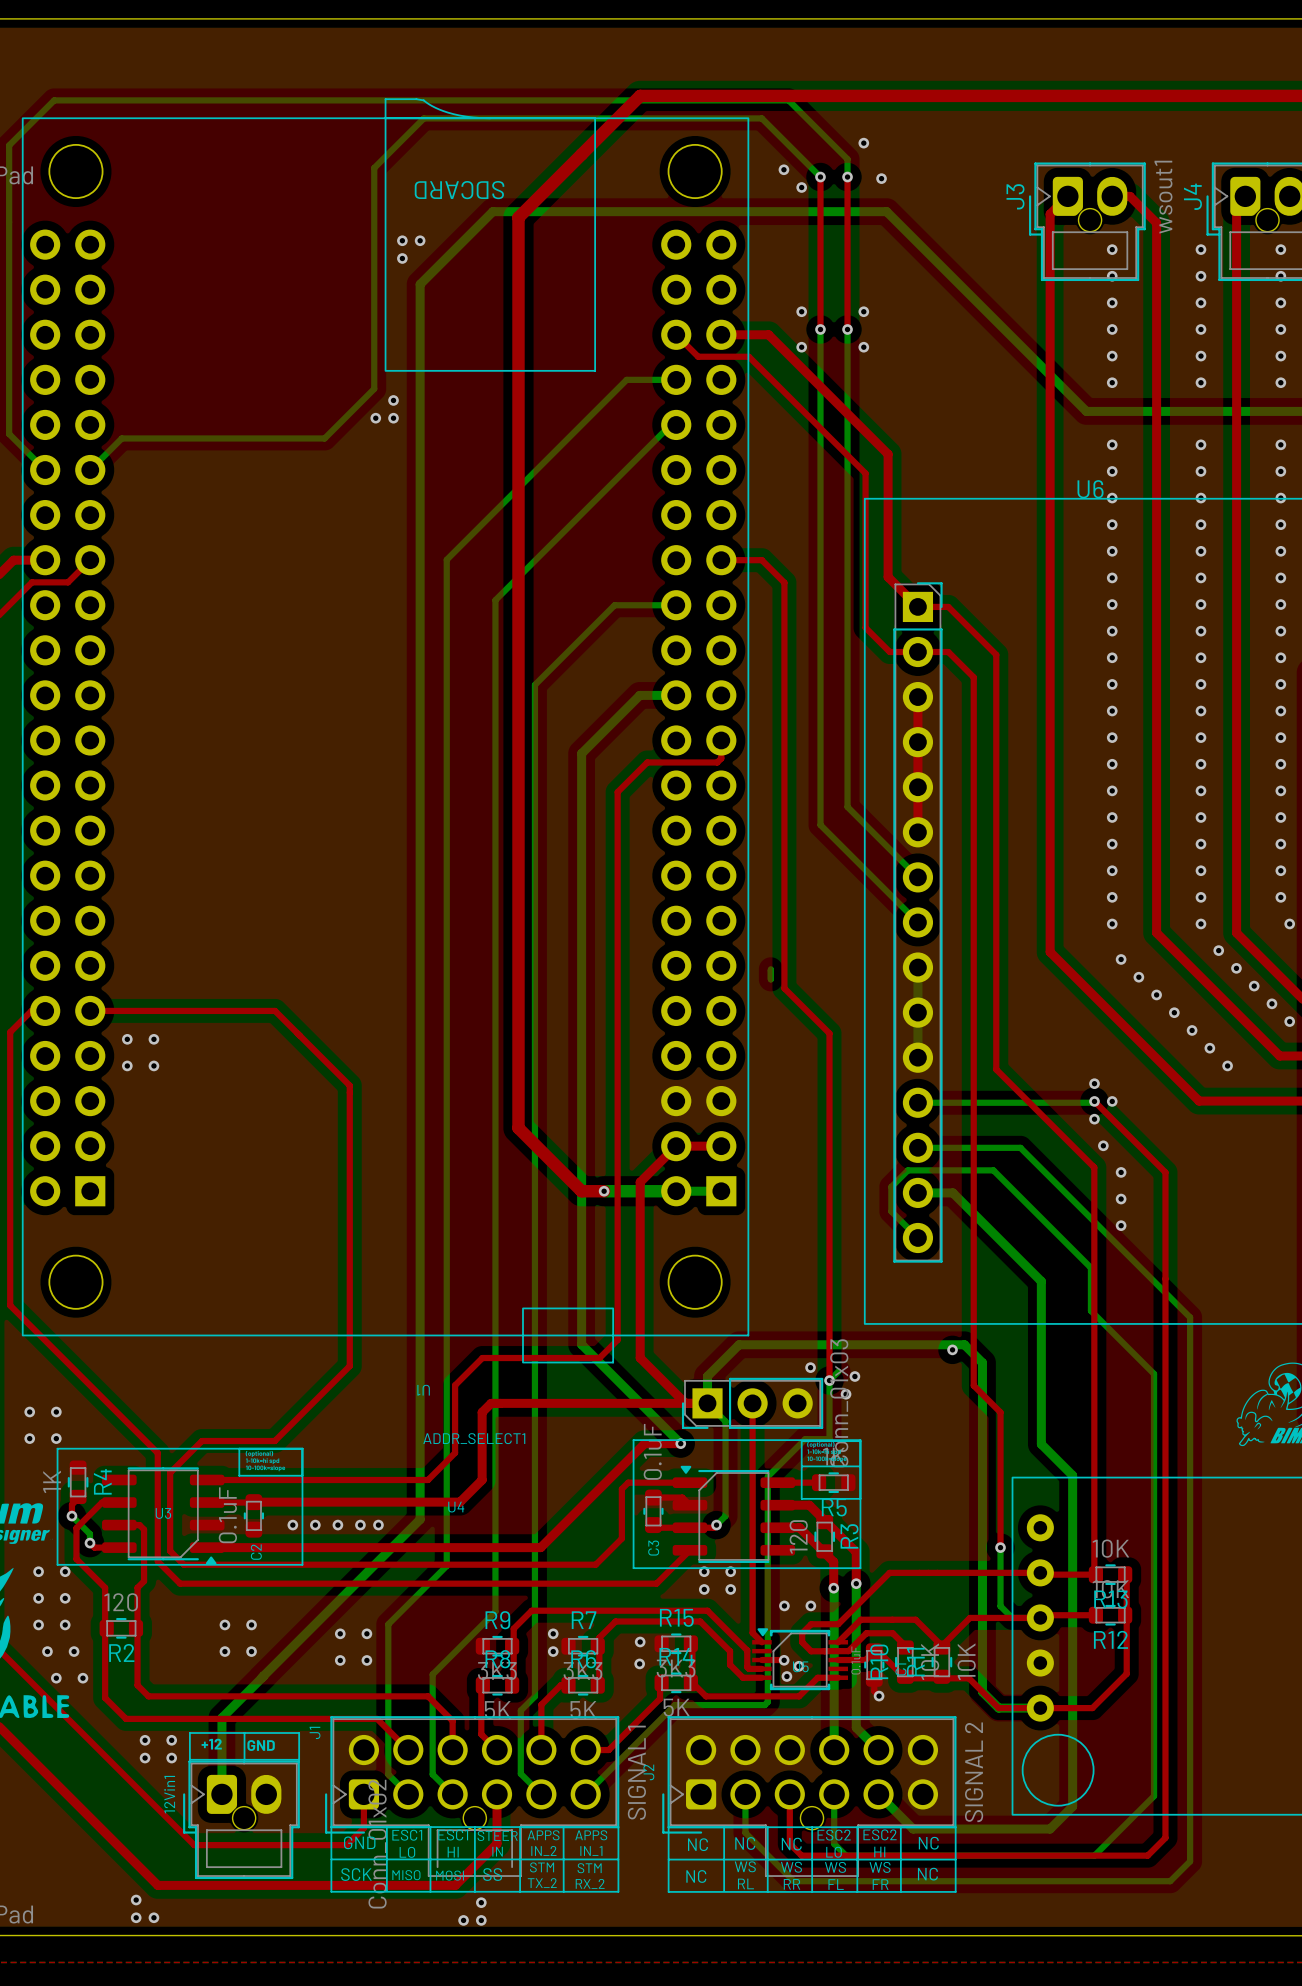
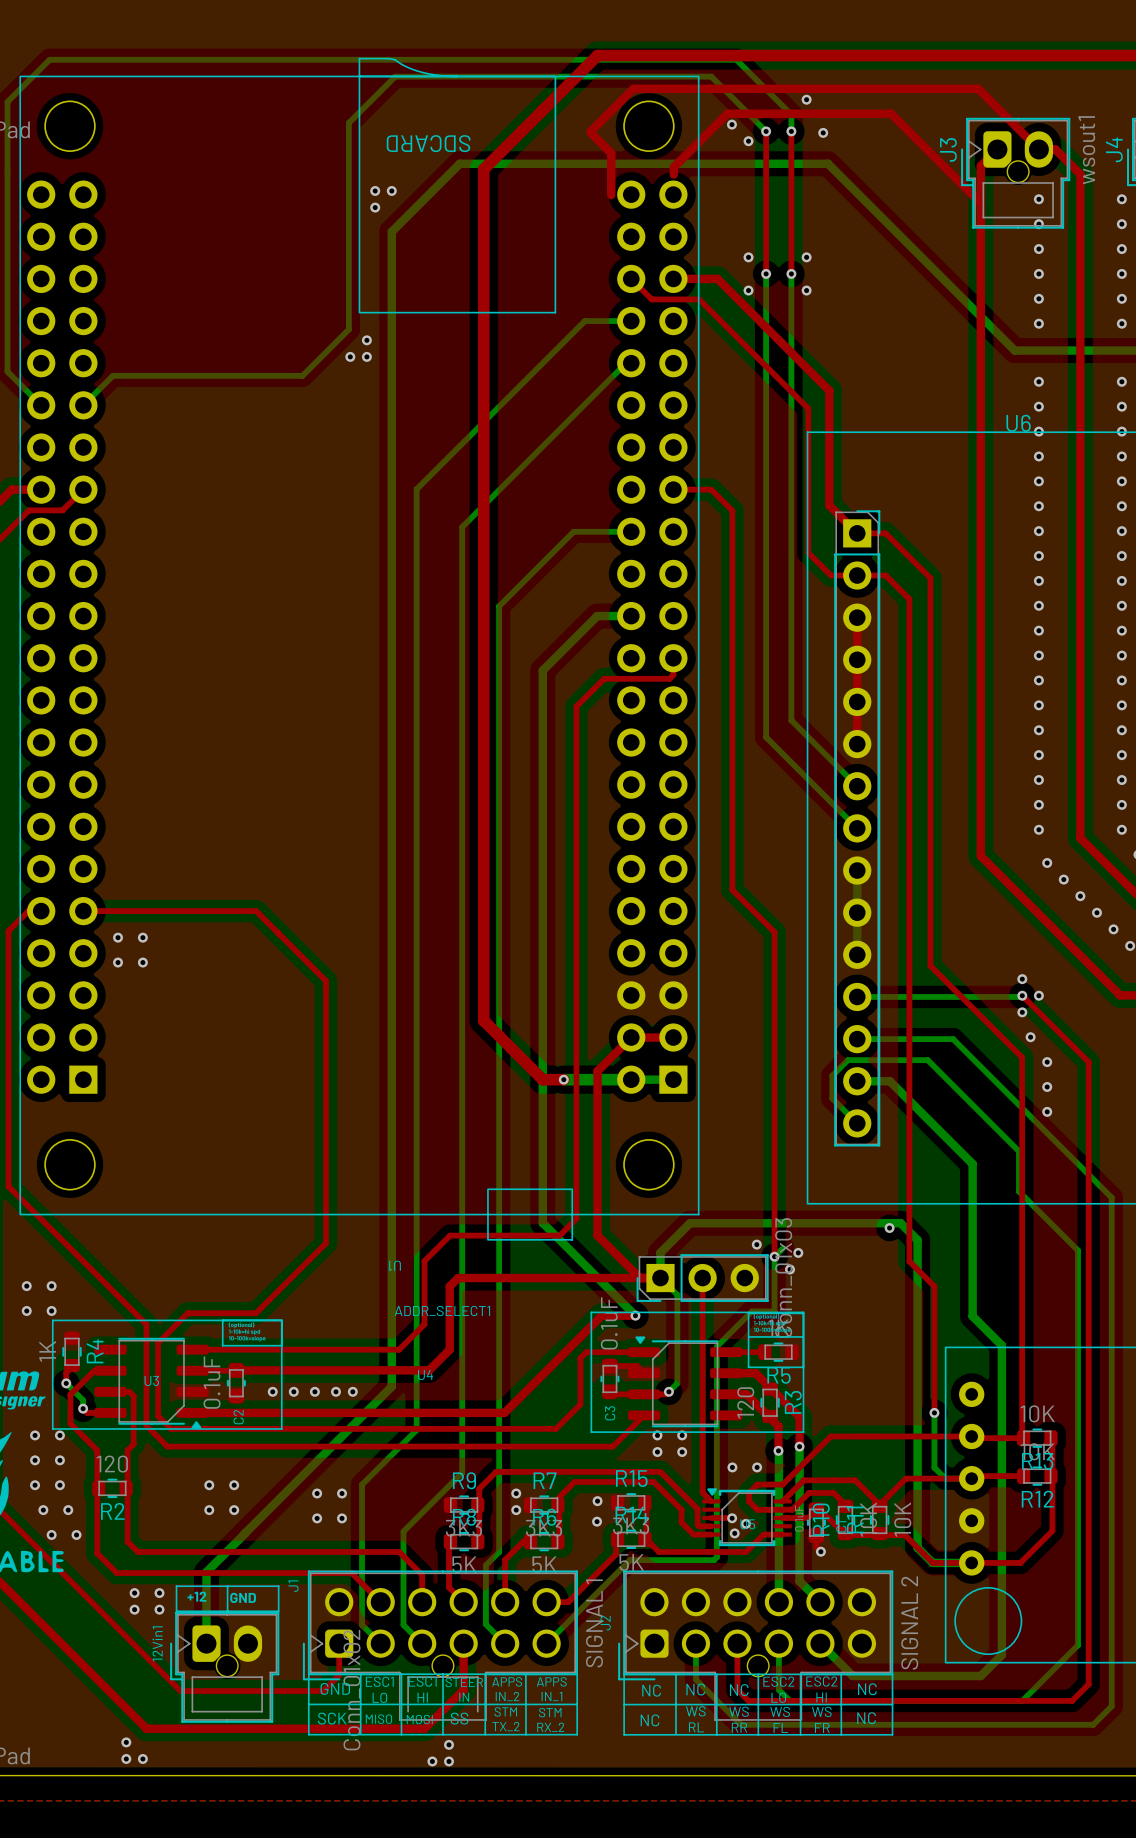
top track: none -> (1038, 149) (978, 88) (633, 88) (590, 131) (611, 153) (611, 195)
top track: none -> (673, 174) (673, 167) (727, 113) (891, 113) (980, 203)
bottom track: (770, 969) (770, 979) -> none

